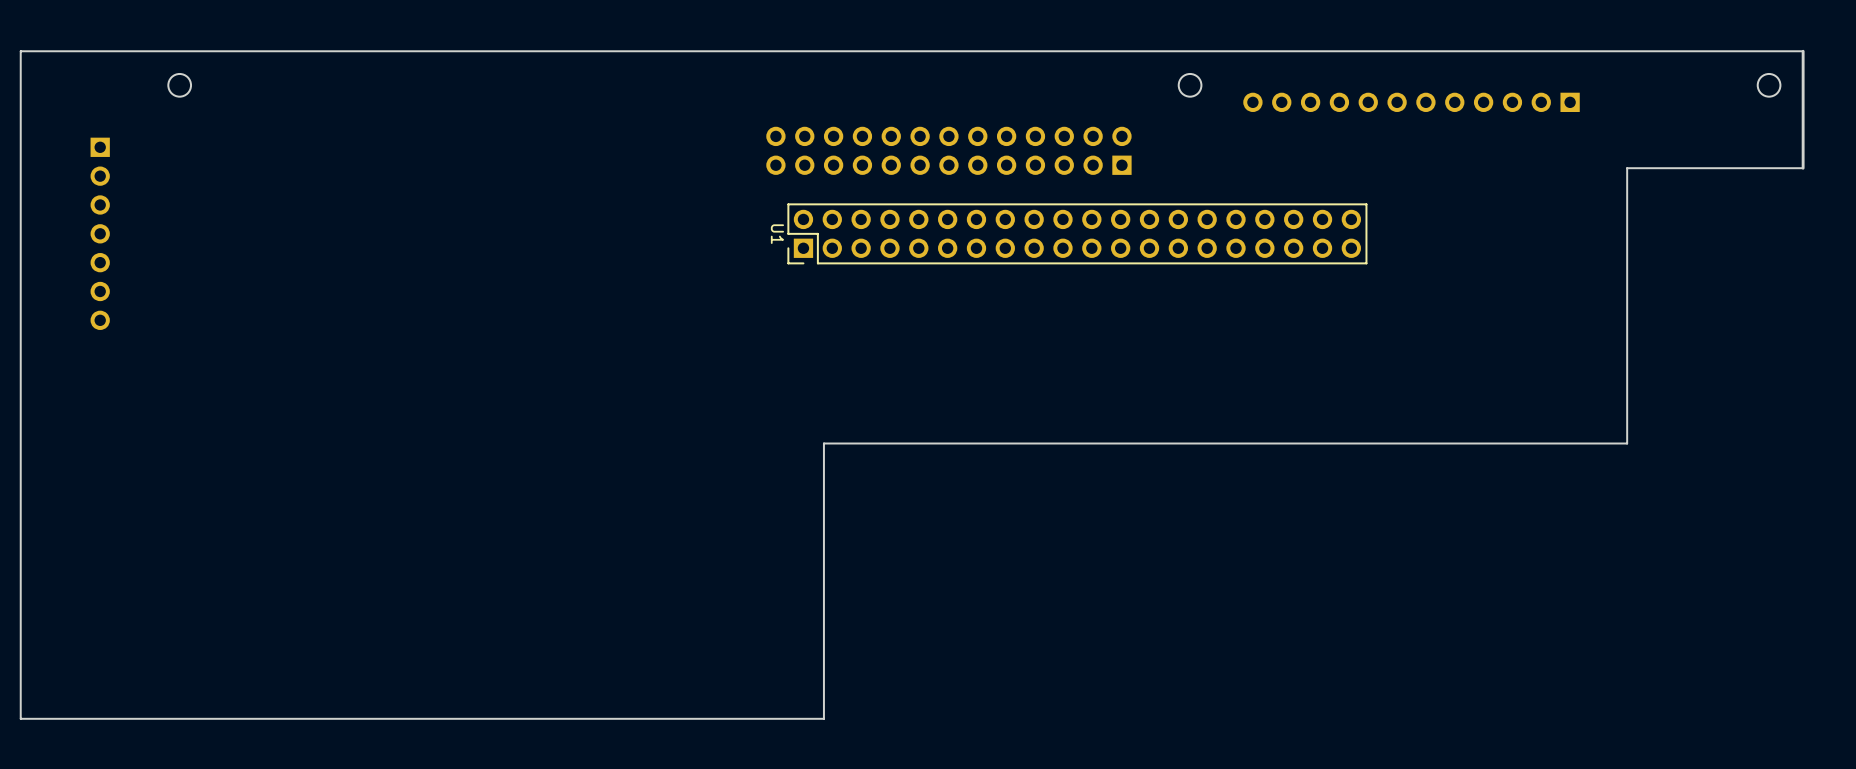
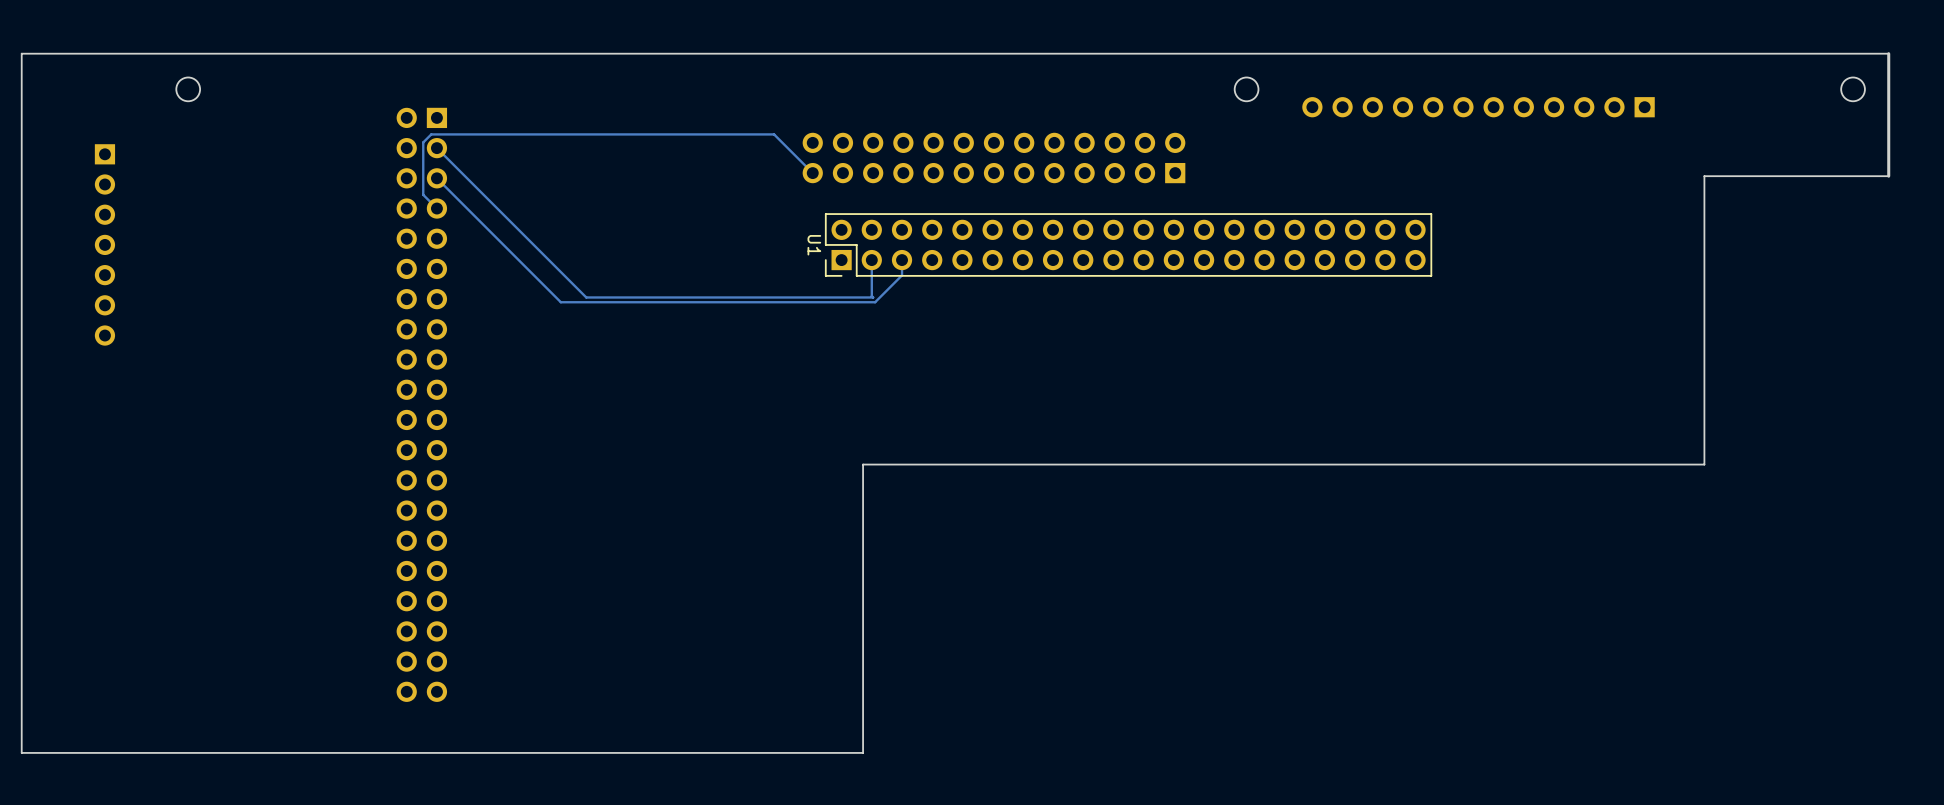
track: none -> (436, 148) (586, 297) (873, 297) (871, 260)
track: none -> (812, 173) (774, 134) (431, 134) (423, 142) (423, 194) (436, 208)
track: none -> (436, 178) (560, 302) (875, 302) (902, 275) (902, 260)
part: none -> (421, 404)

